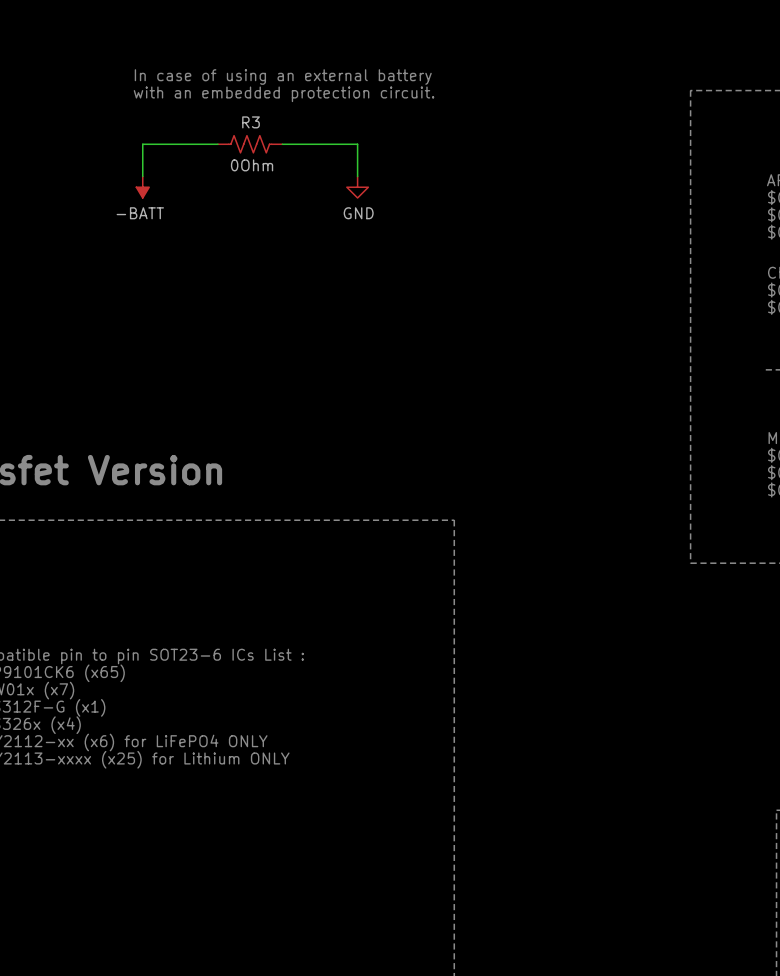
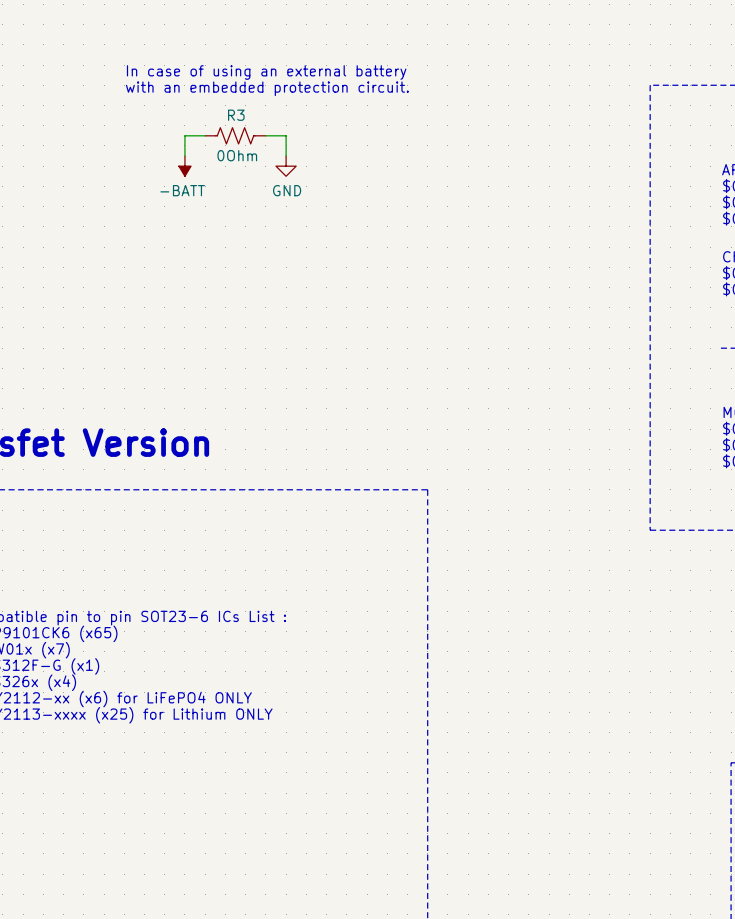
wire: (196, 144) (142, 144) (142, 176) -> (184, 135) (184, 156)
wire: (303, 144) (357, 144) (357, 176) -> (286, 135) (286, 156)
power symbol position: -BATT (142, 187) -> -BATT (184, 166)
power symbol position: GND (357, 187) -> GND (286, 166)

